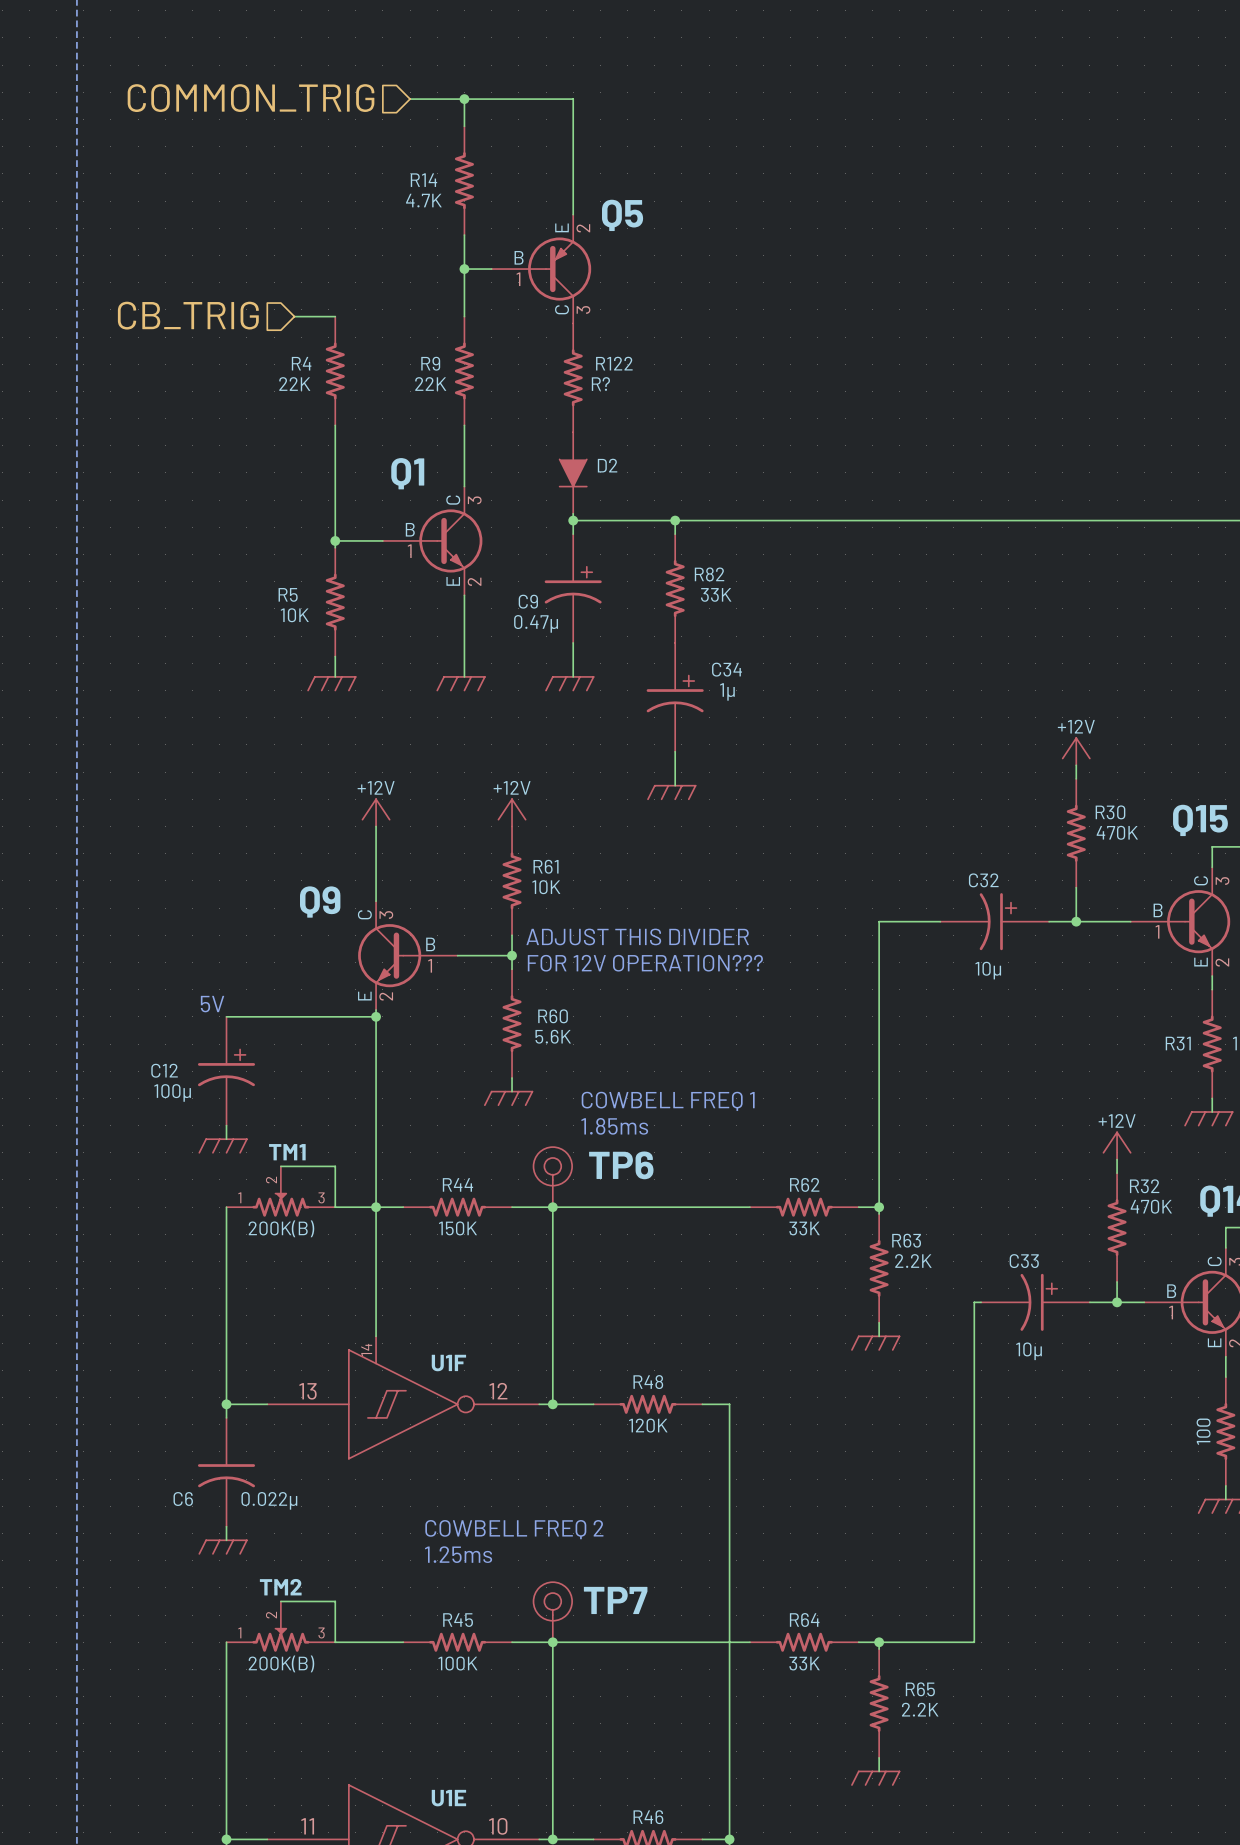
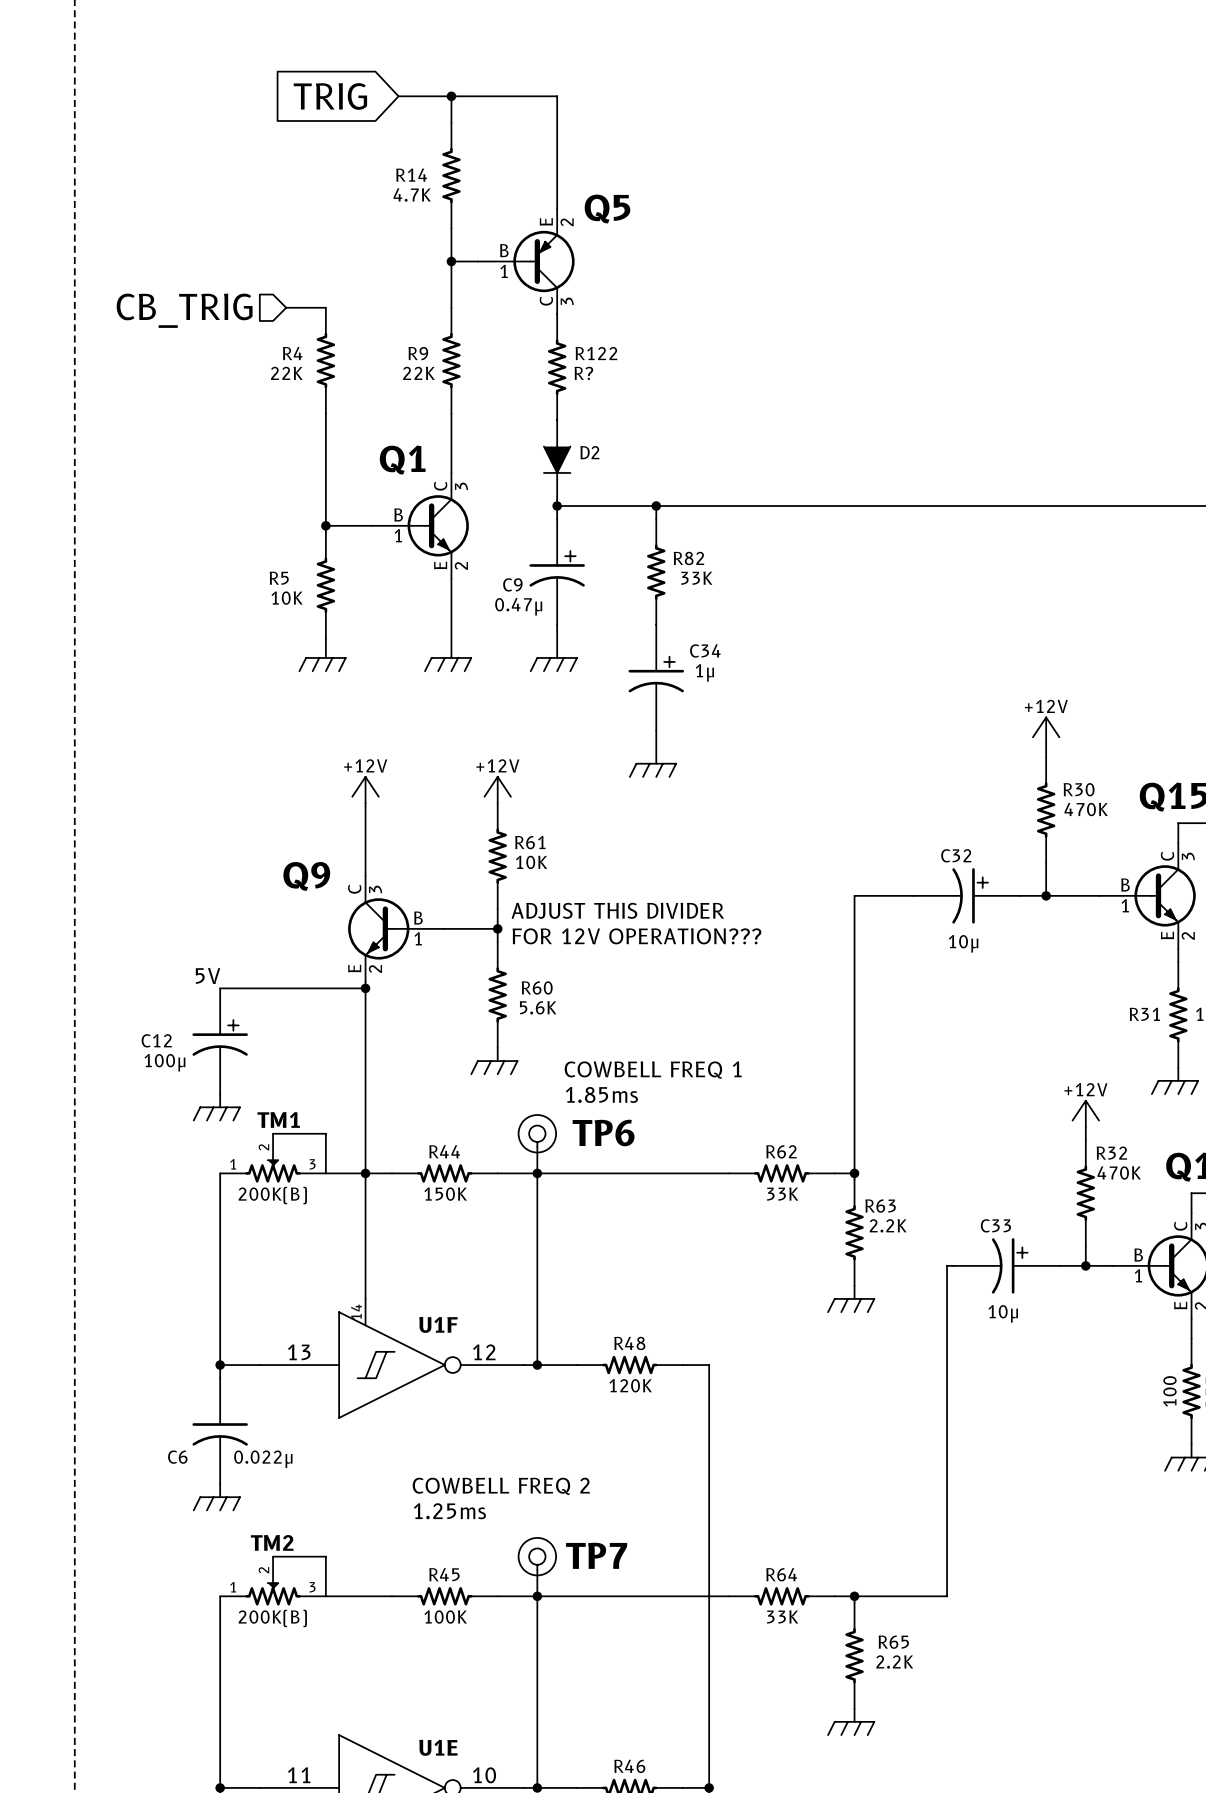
hierarchical label: COMMON_TRIG (251, 98) -> none
global label: none -> TRIG (330, 96)

